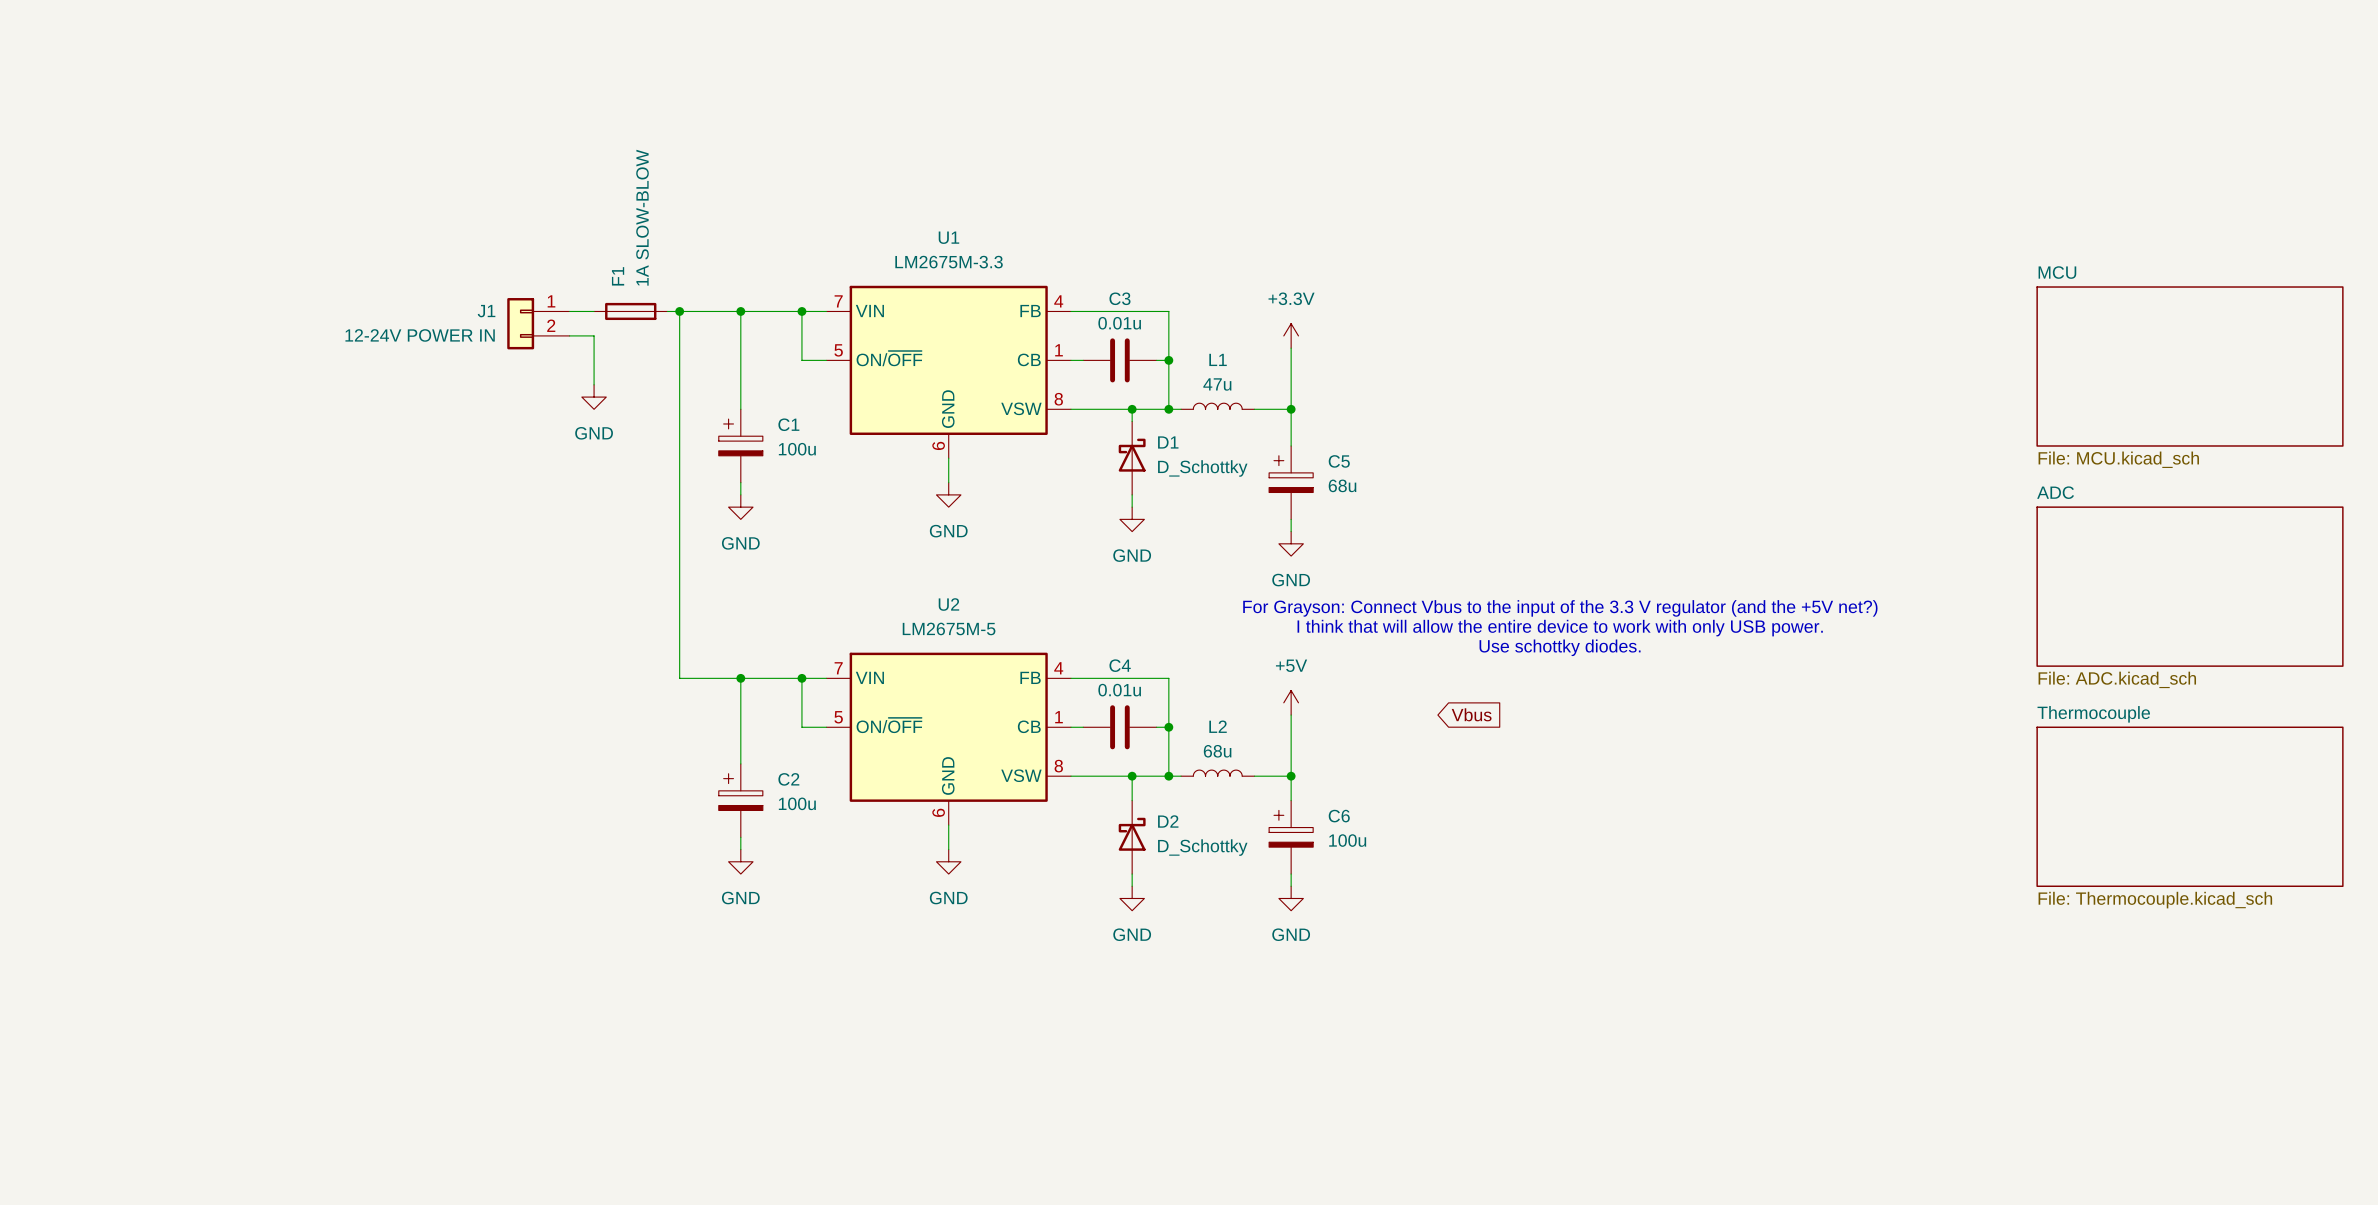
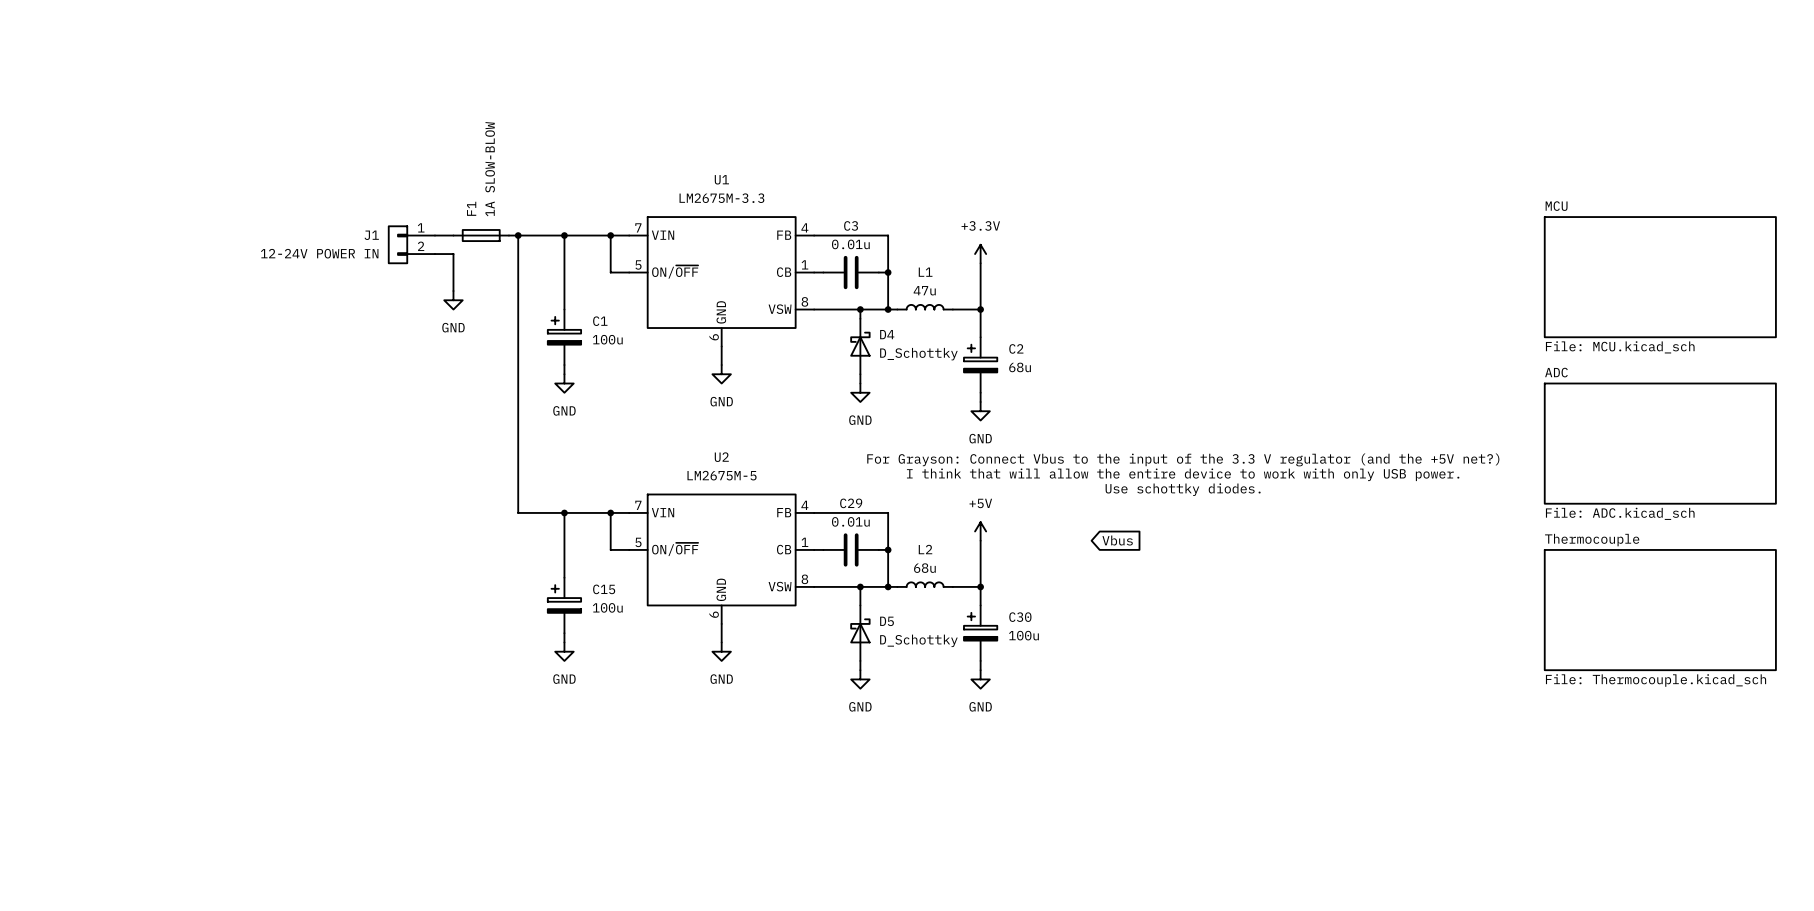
D1 name: D1 (1168, 442) -> D4 (887, 334)
C5 name: C5 (1339, 461) -> C2 (1016, 348)
C4 name: C4 (1120, 665) -> C29 (851, 503)
C2 name: C2 (788, 779) -> C15 (604, 589)
C6 name: C6 (1339, 816) -> C30 (1020, 617)
D2 name: D2 (1168, 821) -> D5 (887, 621)

